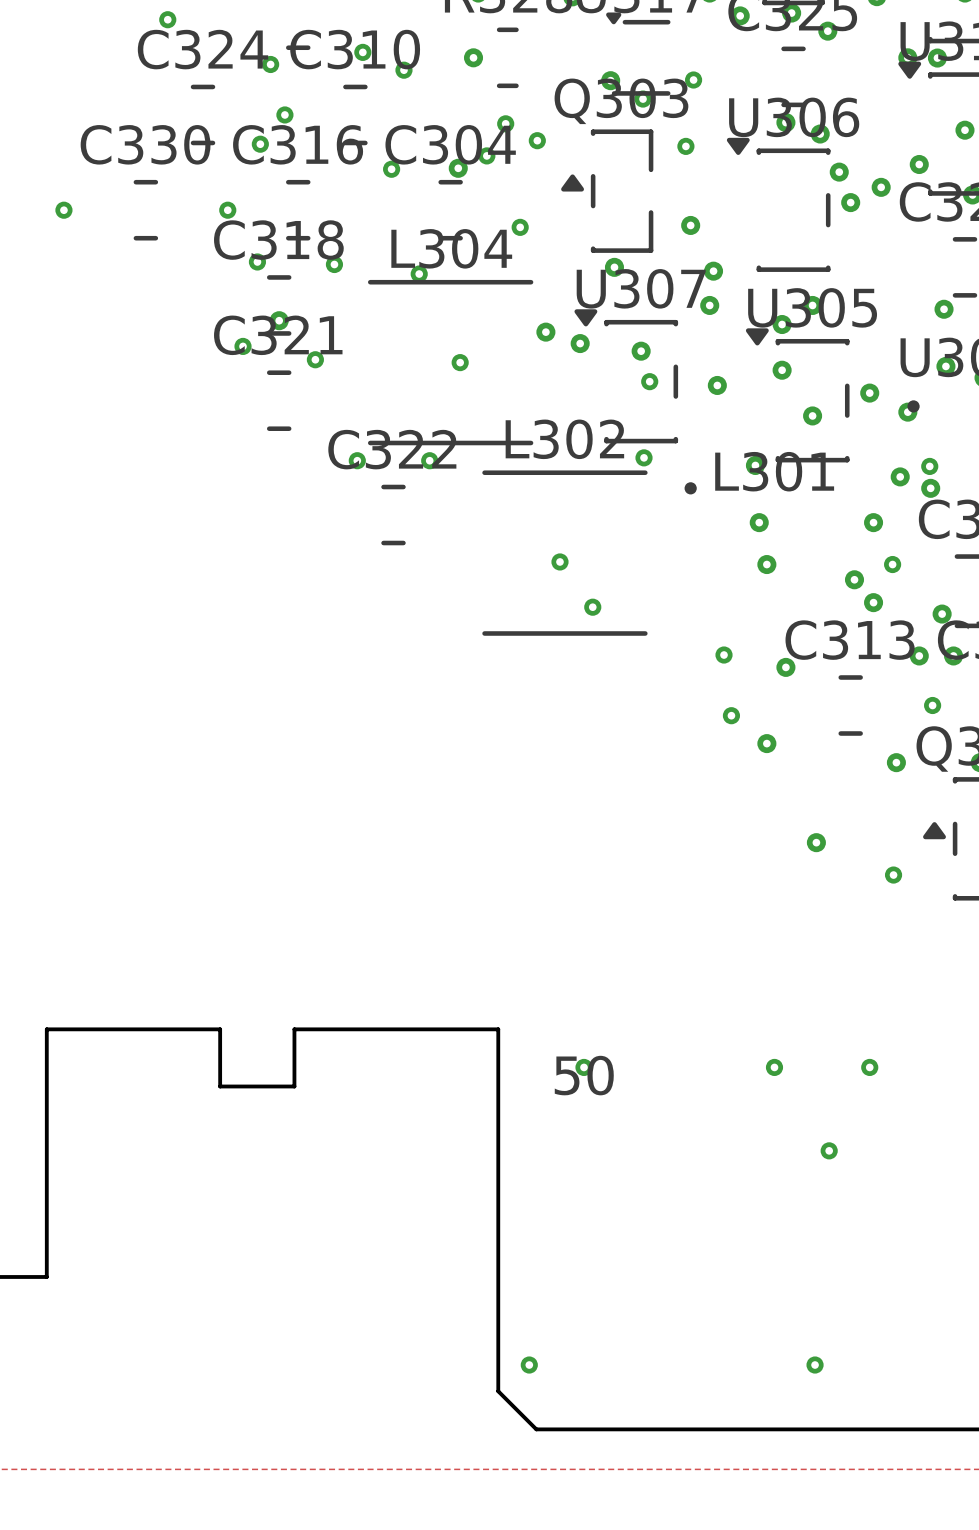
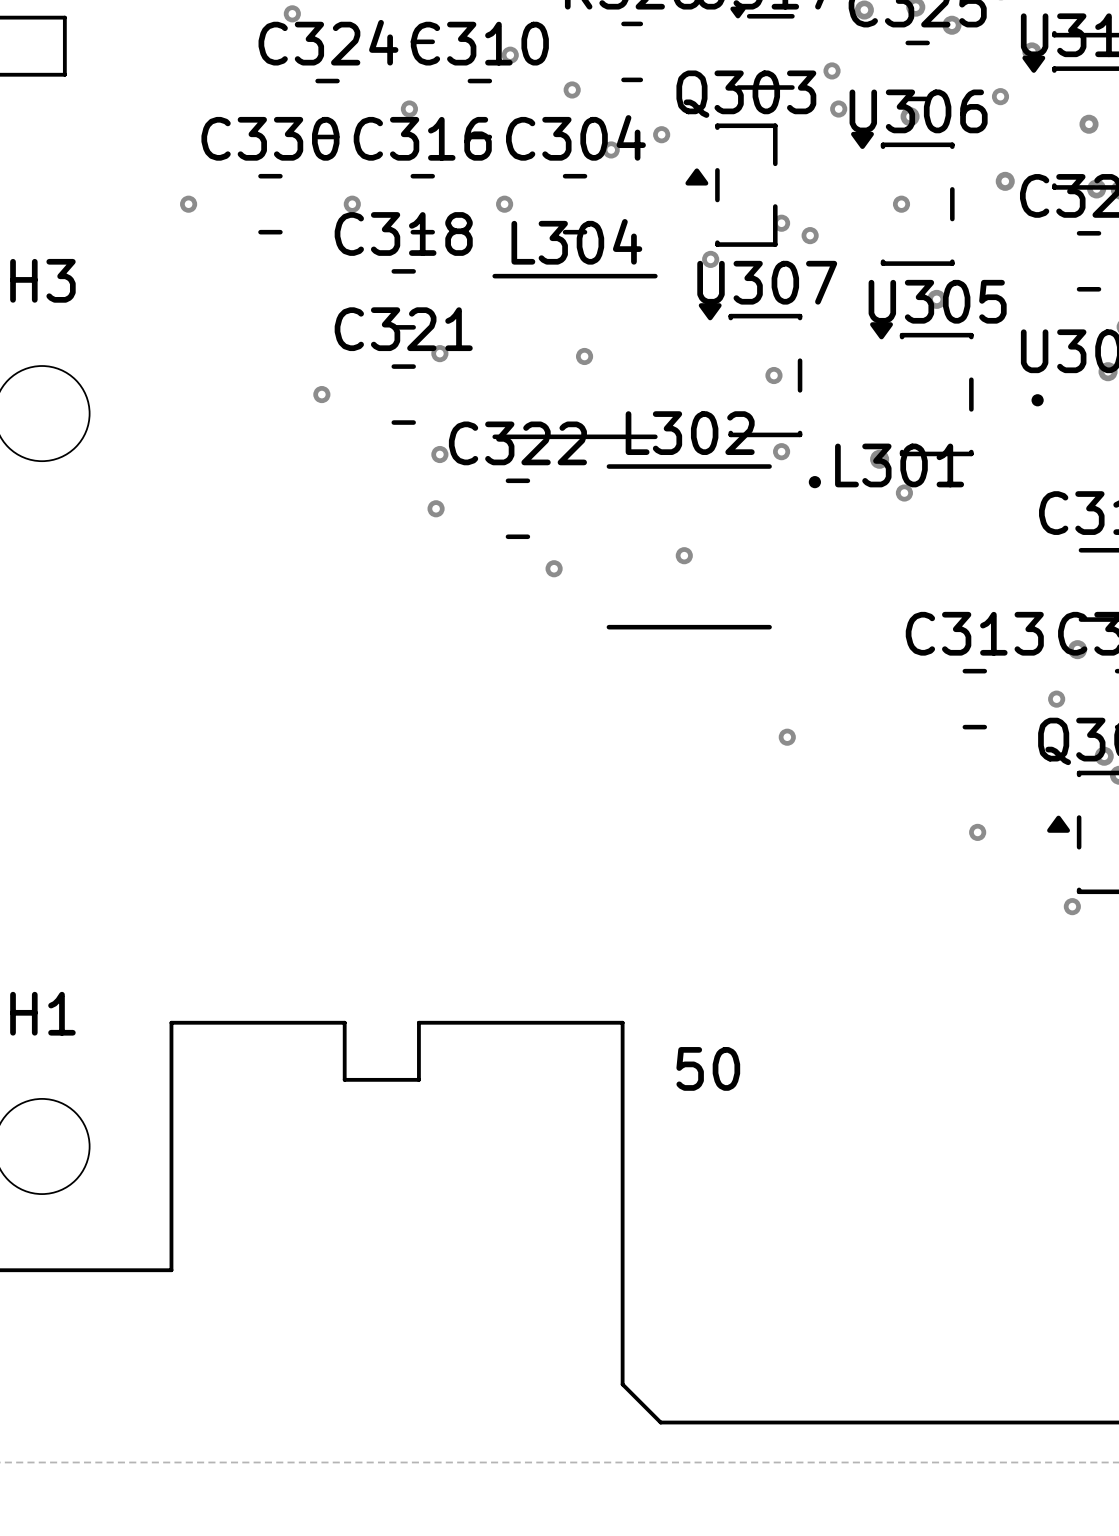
via: (362, 52) -> none
via: (473, 57) -> none
via: (937, 58) -> none
via: none -> (510, 55)
via: (270, 64) -> none
via: (403, 70) -> none
via: (610, 80) -> none
via position: (693, 80) -> (832, 70)
via: none -> (572, 89)
via: (643, 99) -> none
via: none -> (1000, 96)
via: none -> (838, 109)
via: (505, 123) -> none
via: (820, 134) -> none
via: (260, 144) -> none
via: (685, 146) -> none
via: (919, 164) -> none
via: (458, 168) -> none
via: (391, 169) -> none
via: (839, 172) -> none
via: (850, 202) -> none
via: none -> (504, 204)
via: none -> (901, 204)
via position: (690, 225) -> (810, 235)
via: (520, 227) -> none
via: none -> (781, 223)
via: (257, 261) -> none
via: (334, 264) -> none
via: none -> (710, 259)
via: (614, 267) -> none
via: (713, 271) -> none
via: (419, 274) -> none
via: (709, 305) -> none
via: (944, 309) -> none
via: (279, 320) -> none
via: (782, 324) -> none
via: (545, 332) -> none
via: (580, 343) -> none
via: (243, 346) -> none
via: (641, 351) -> none
via: (945, 366) -> none
via: (782, 370) -> none
via: (717, 385) -> none
via: (869, 393) -> none
via: none -> (321, 394)
via: (907, 412) -> none
via: (812, 415) -> none
via position: (644, 457) -> (781, 451)
via: none -> (439, 454)
via: (357, 460) -> none
via: (429, 460) -> none
via: (929, 466) -> none
via: (900, 476) -> none
via: (930, 488) -> none
via: none -> (904, 493)
via: none -> (436, 508)
via: (759, 522) -> none
via: (873, 522) -> none
via: (766, 564) -> none
via: (892, 564) -> none
via: none -> (554, 568)
via: (854, 579) -> none
via: (873, 602) -> none
via: (592, 607) -> none
via: (942, 614) -> none
via: (724, 655) -> none
via: (919, 655) -> none
via: (785, 667) -> none
via: (731, 715) -> none
via: none -> (787, 737)
via: (766, 743) -> none
via: (896, 762) -> none
via: none -> (977, 832)
via: (816, 842) -> none
via: (893, 875) -> none
via: none -> (1072, 906)
via: (583, 1067) -> none
via: (774, 1067) -> none
via: (869, 1067) -> none
via: (829, 1150) -> none
via: (529, 1365) -> none
via: (815, 1365) -> none

